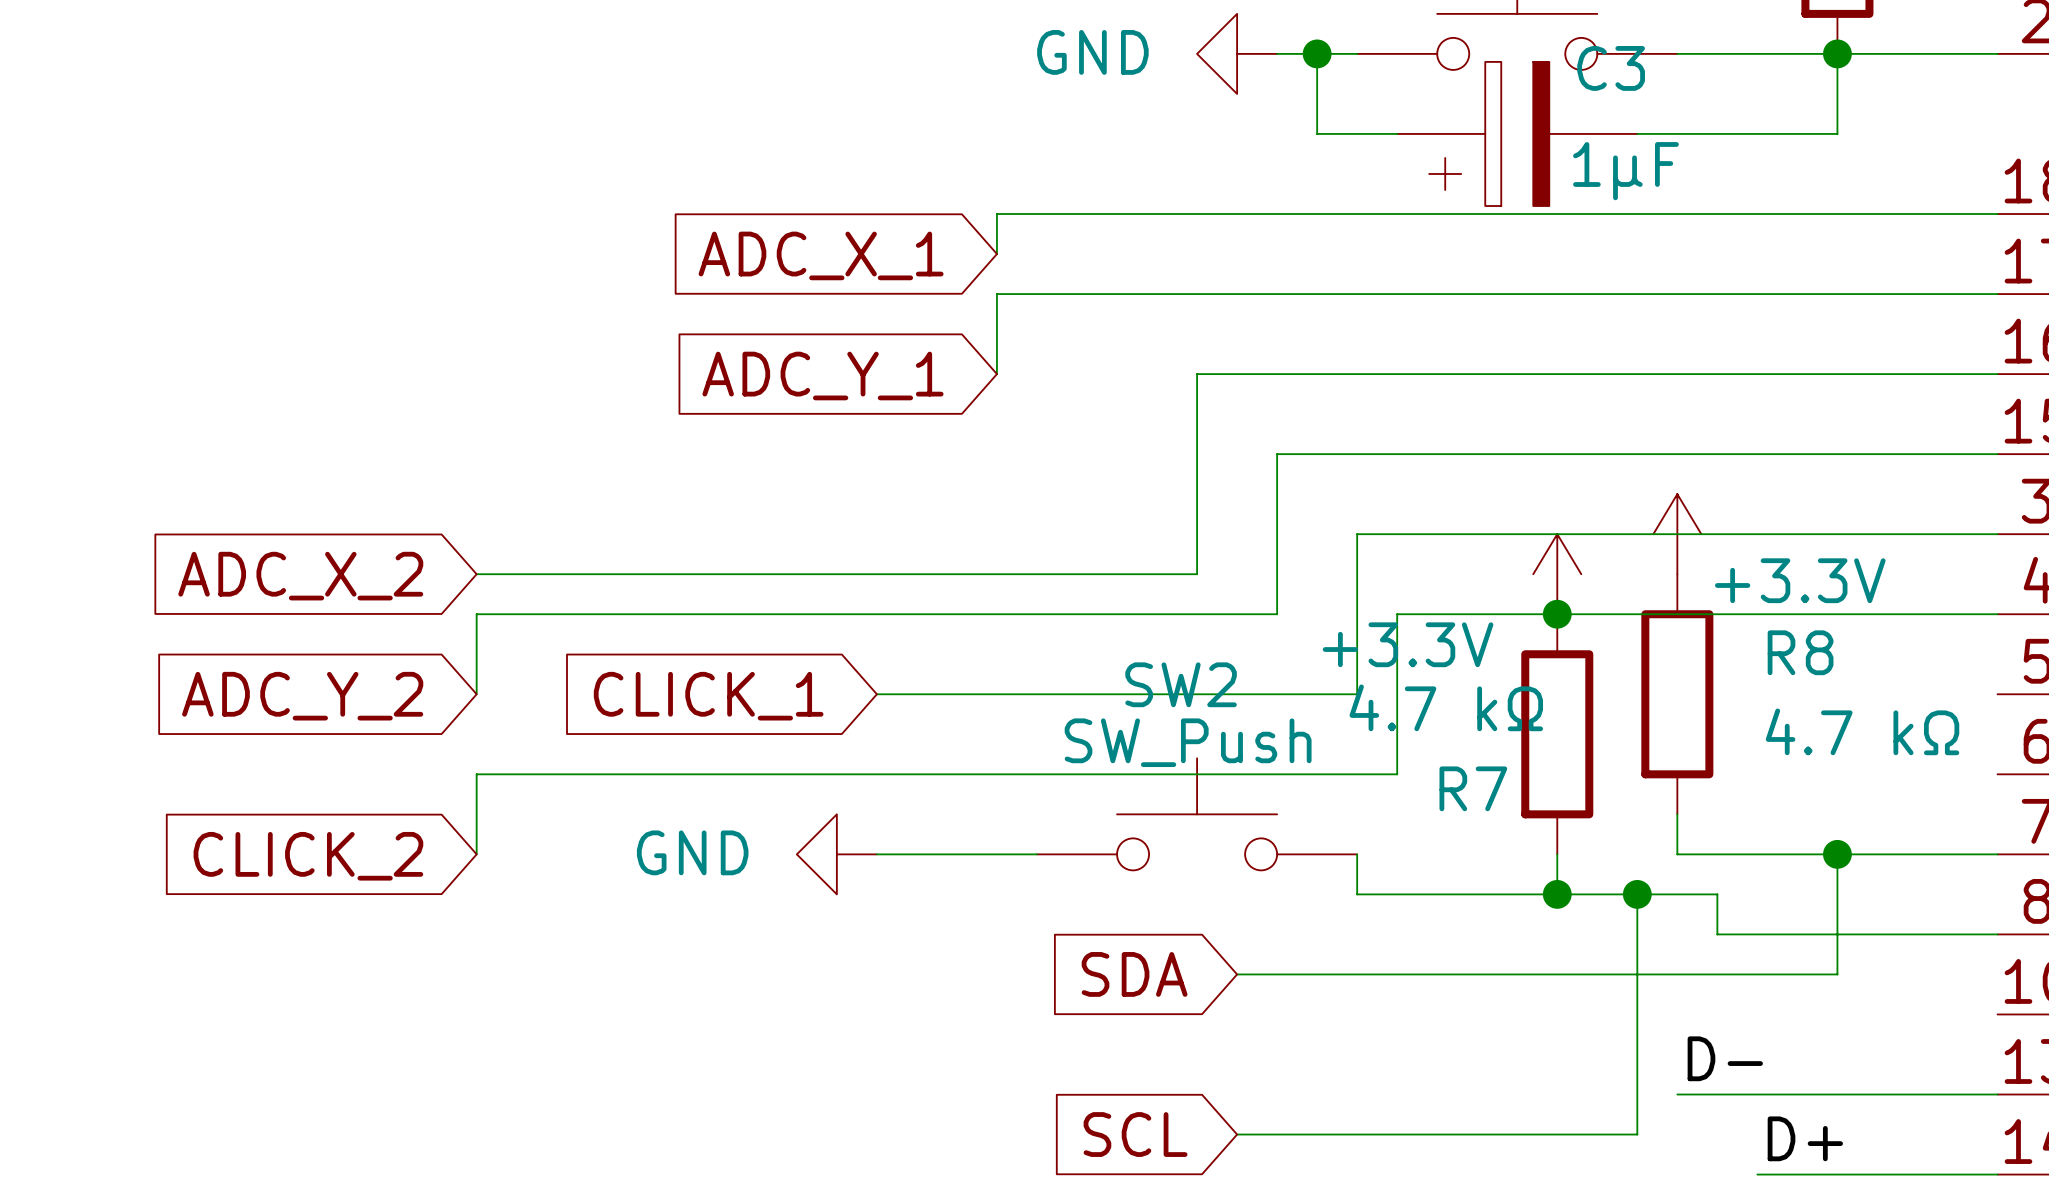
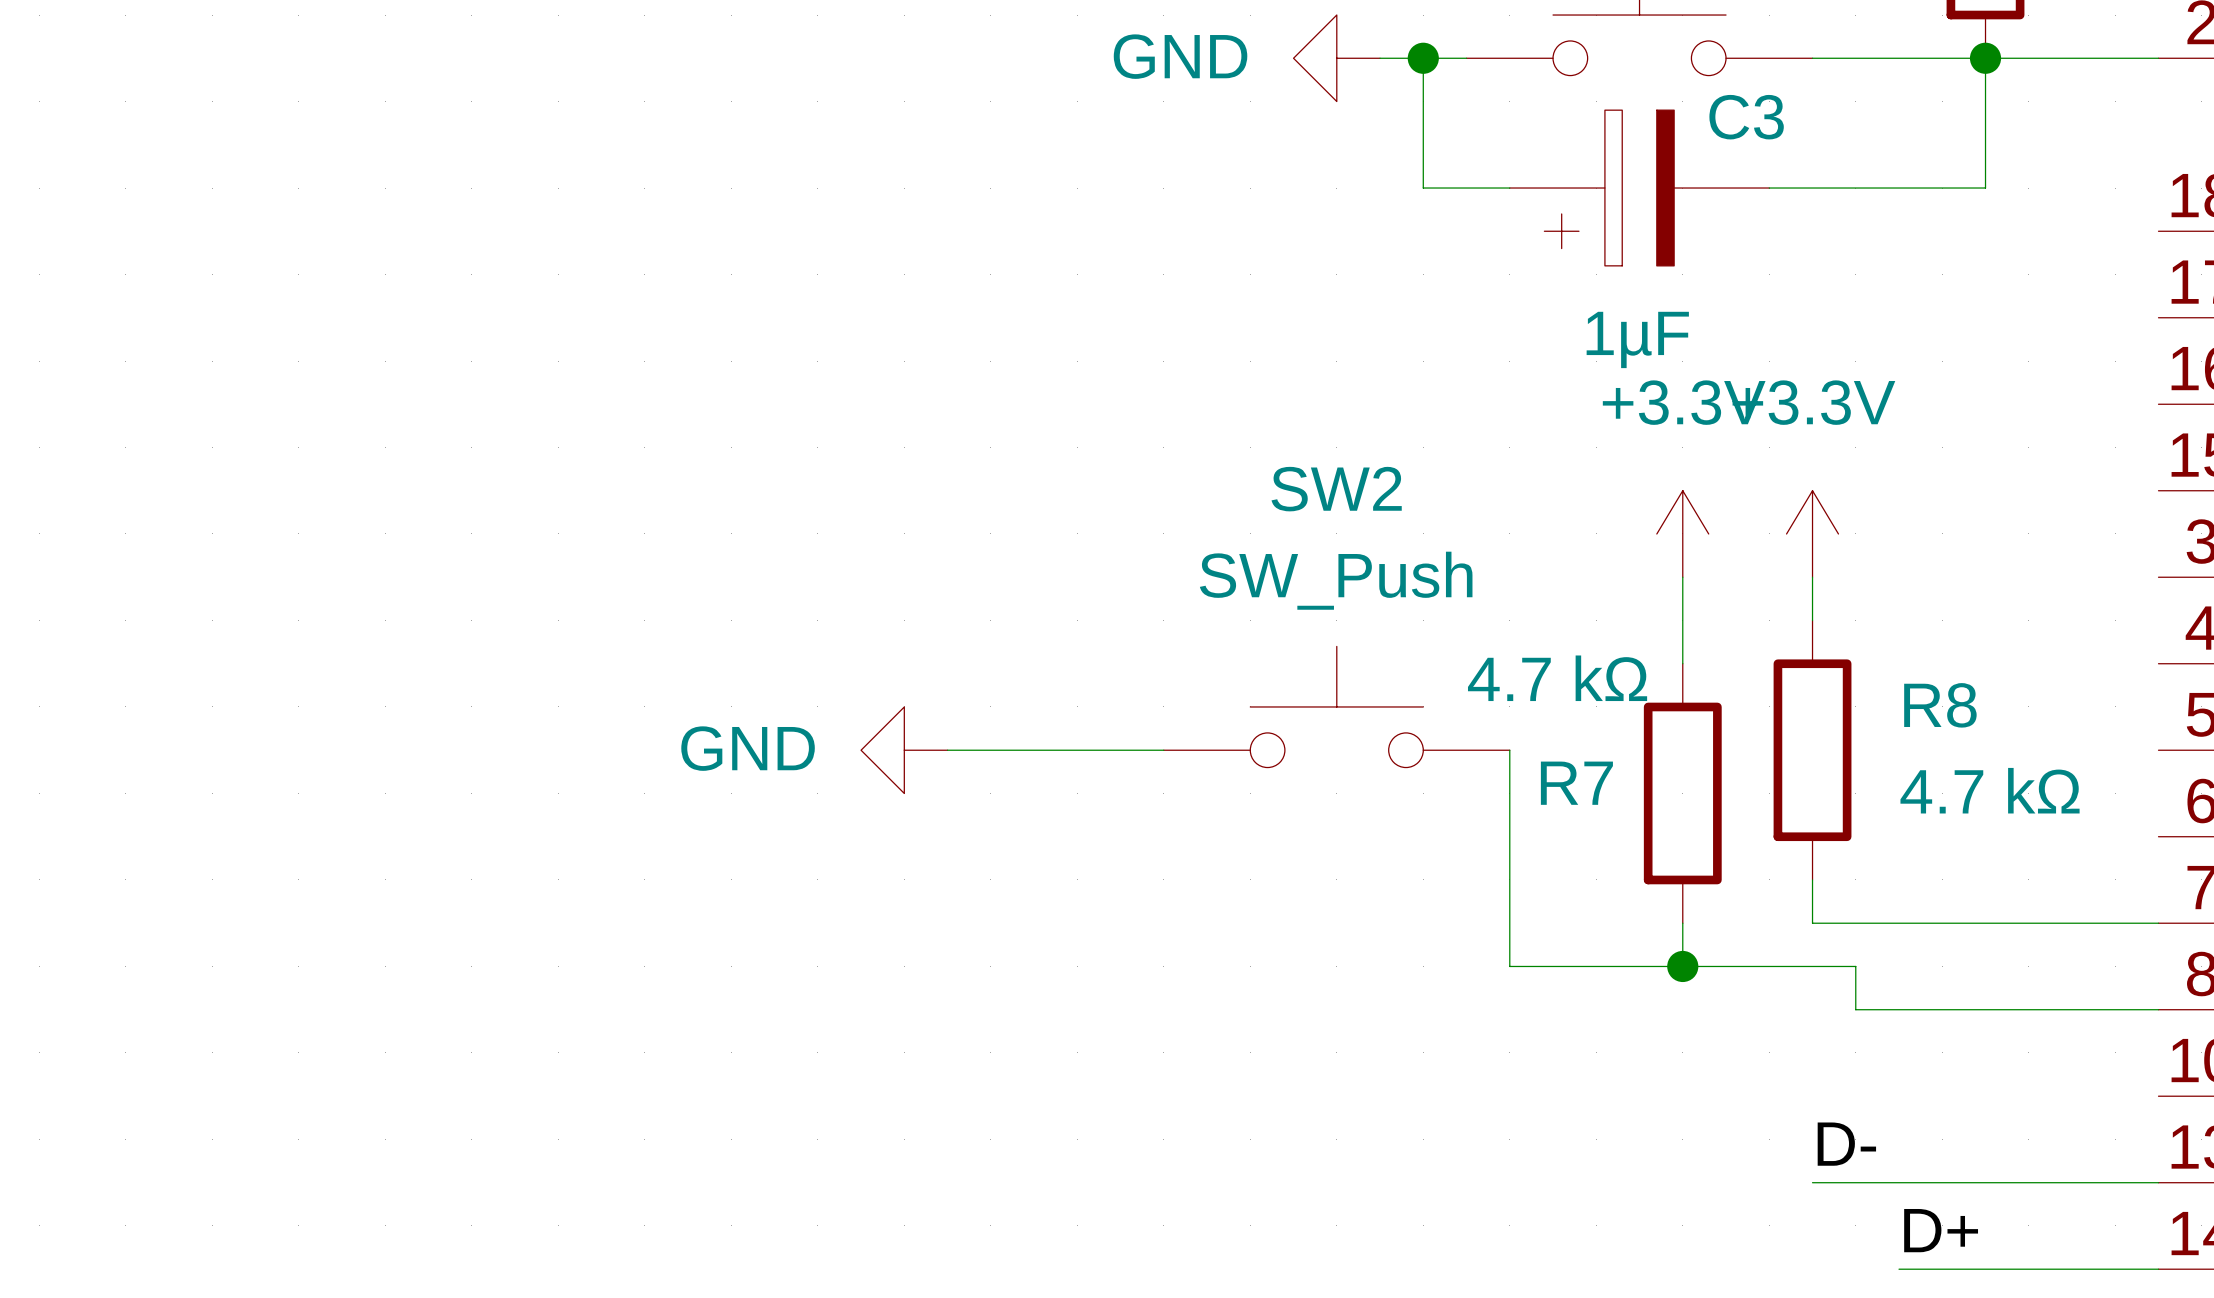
wire: (1317, 133) (1397, 133) -> (1423, 144) (1423, 188) (1509, 188)
C3 position: (1517, 133) -> (1639, 188)
wire: (1637, 133) (1837, 133) -> (1769, 188) (1985, 188) (1985, 144)
C3 value position: 1µF (1625, 171) -> 1µF (1637, 339)
wire: (1997, 214) (996, 214) (996, 254) -> none
global label: ADC_X_1 (821, 255) -> none
wire: (1997, 294) (996, 294) (996, 374) -> none
wire: (1997, 374) (1197, 374) (1197, 574) (476, 574) -> none
global label: ADC_Y_1 (822, 376) -> none
wire: (1997, 454) (1277, 454) (1277, 614) (476, 614) (476, 694) -> none
power symbol: none -> +3.3V (1682, 533)
power symbol position: +3.3V (1677, 534) -> +3.3V (1812, 533)
wire: (1997, 534) (1357, 534) (1357, 694) (1077, 694) -> none
power symbol: +3.3V (1557, 574) -> none
global label: ADC_X_2 (300, 576) -> none
power symbol text position: +3.3V (1800, 580) -> +3.3V (1813, 402)
junction: (1557, 614) -> none
wire: (1997, 614) (1397, 614) (1397, 694) -> none
SW2 name position: SW2 (1181, 684) -> SW2 (1336, 489)
global label: ADC_Y_2 (302, 696) -> none
global label: CLICK_1 (708, 696) -> none
R7 value position: 4.7 kΩ (1446, 707) -> 4.7 kΩ (1557, 678)
SW2 value position: SW_Push (1188, 742) -> SW_Push (1336, 580)
wire: (1397, 774) (476, 774) (476, 854) -> none
R7 name position: R7 (1473, 788) -> R7 (1576, 783)
SW2 position: (1197, 814) -> (1336, 706)
power symbol position: GND (836, 854) -> GND (904, 750)
wire: (876, 854) (1036, 854) -> none
wire: (1357, 854) (1357, 894) (1397, 894) -> (1509, 836) (1509, 966)
wire: (1837, 854) (1837, 974) (1237, 974) -> none
junction: (1837, 854) -> none
global label: CLICK_2 (308, 856) -> none
wire: (1637, 894) (1637, 1134) (1237, 1134) -> none
junction: (1637, 894) -> none
global label: SDA (1134, 974) -> none
global label: SCL (1135, 1134) -> none

